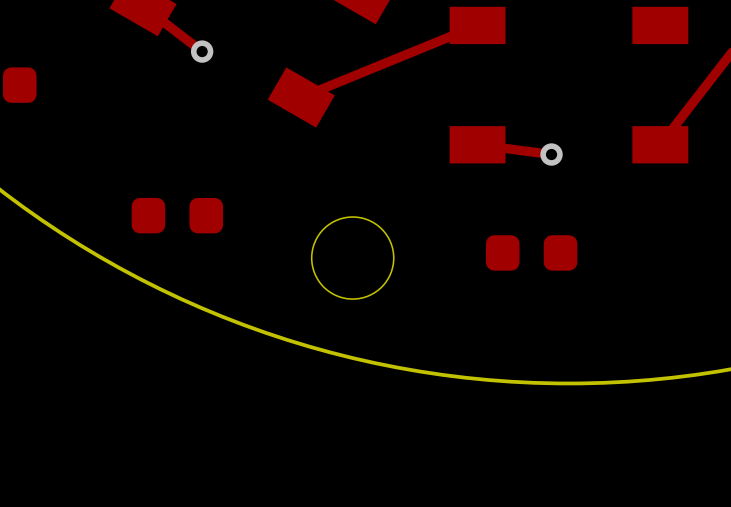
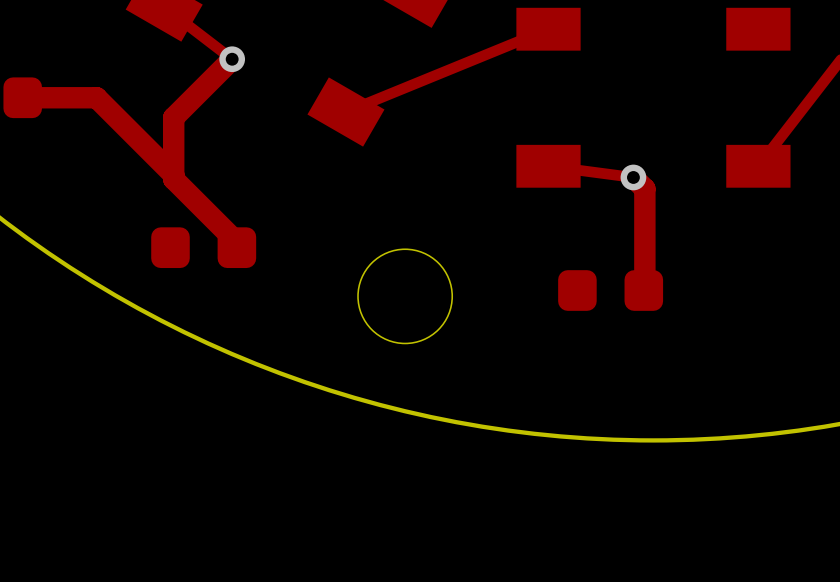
top track: none -> (232, 59) (173, 117) (173, 179) (237, 243) (236, 247)
top track: none -> (22, 97) (96, 97) (173, 174)
top track: none -> (633, 177) (644, 188) (643, 290)

